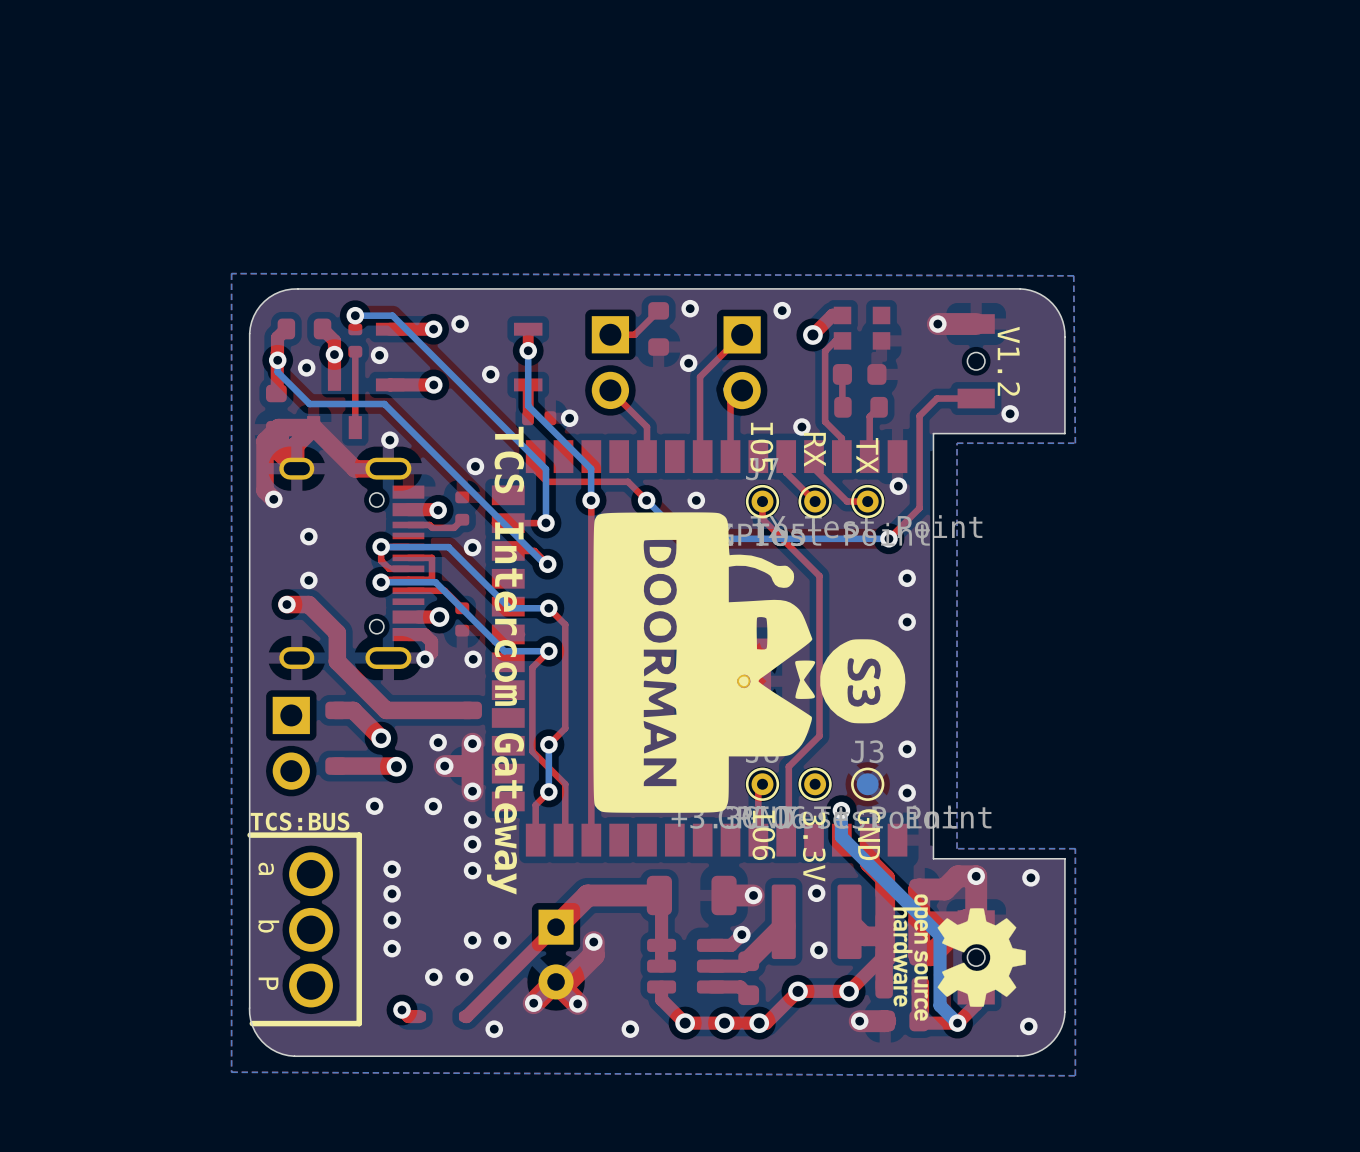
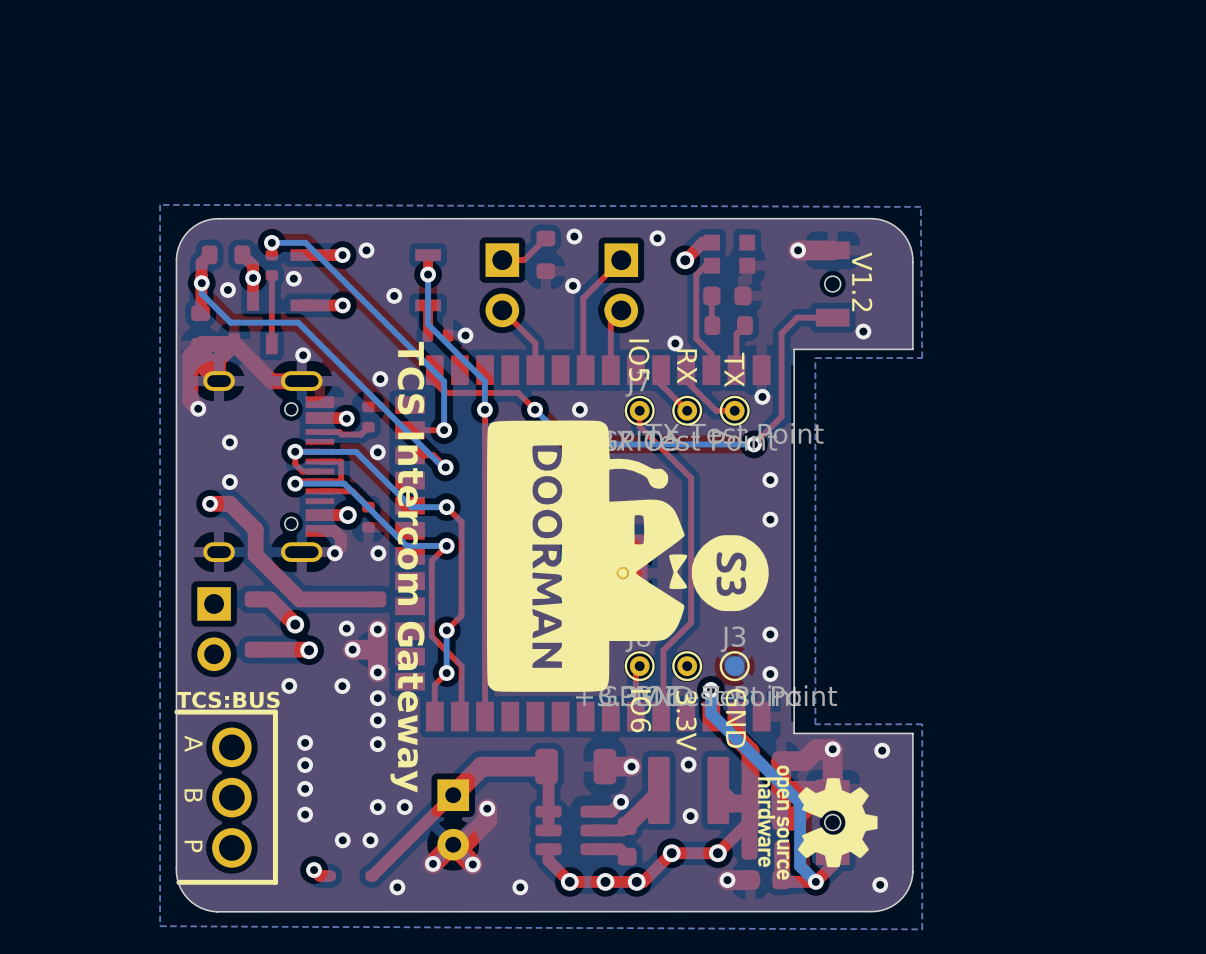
text: a (266, 868) -> A (193, 743)
text: b (268, 926) -> B (193, 795)

